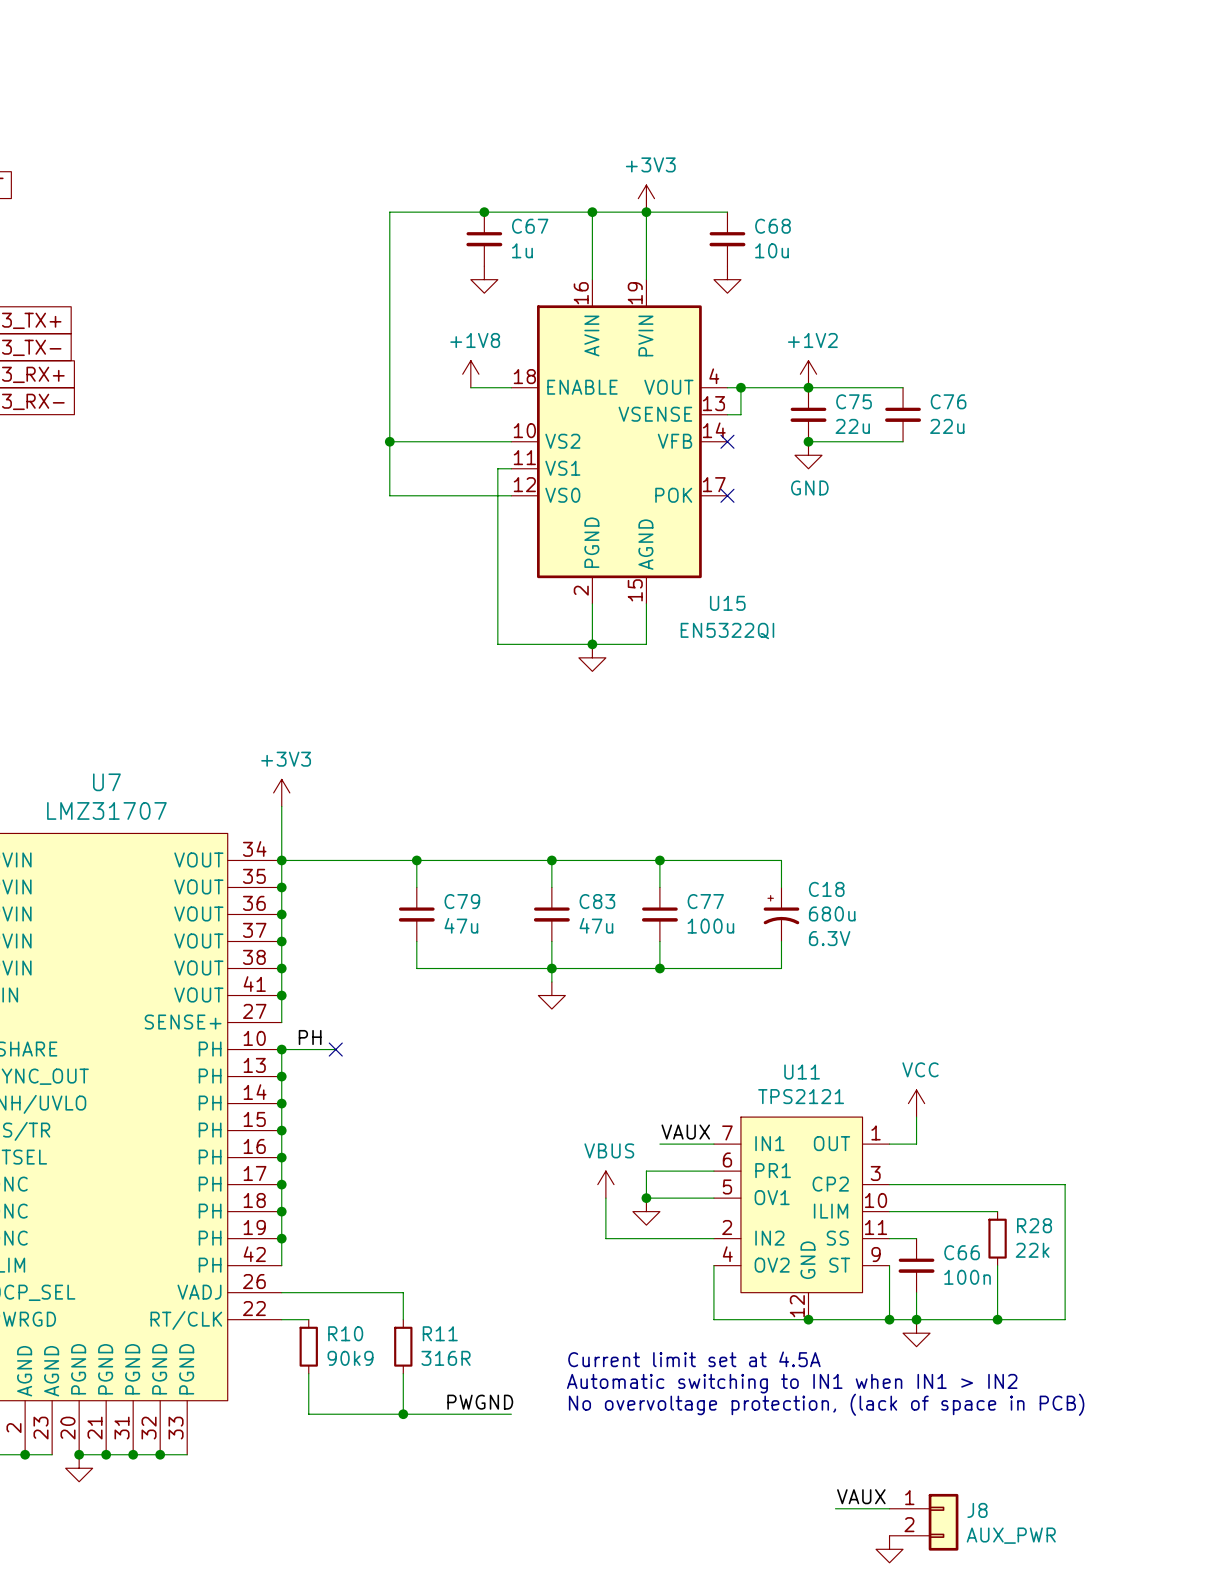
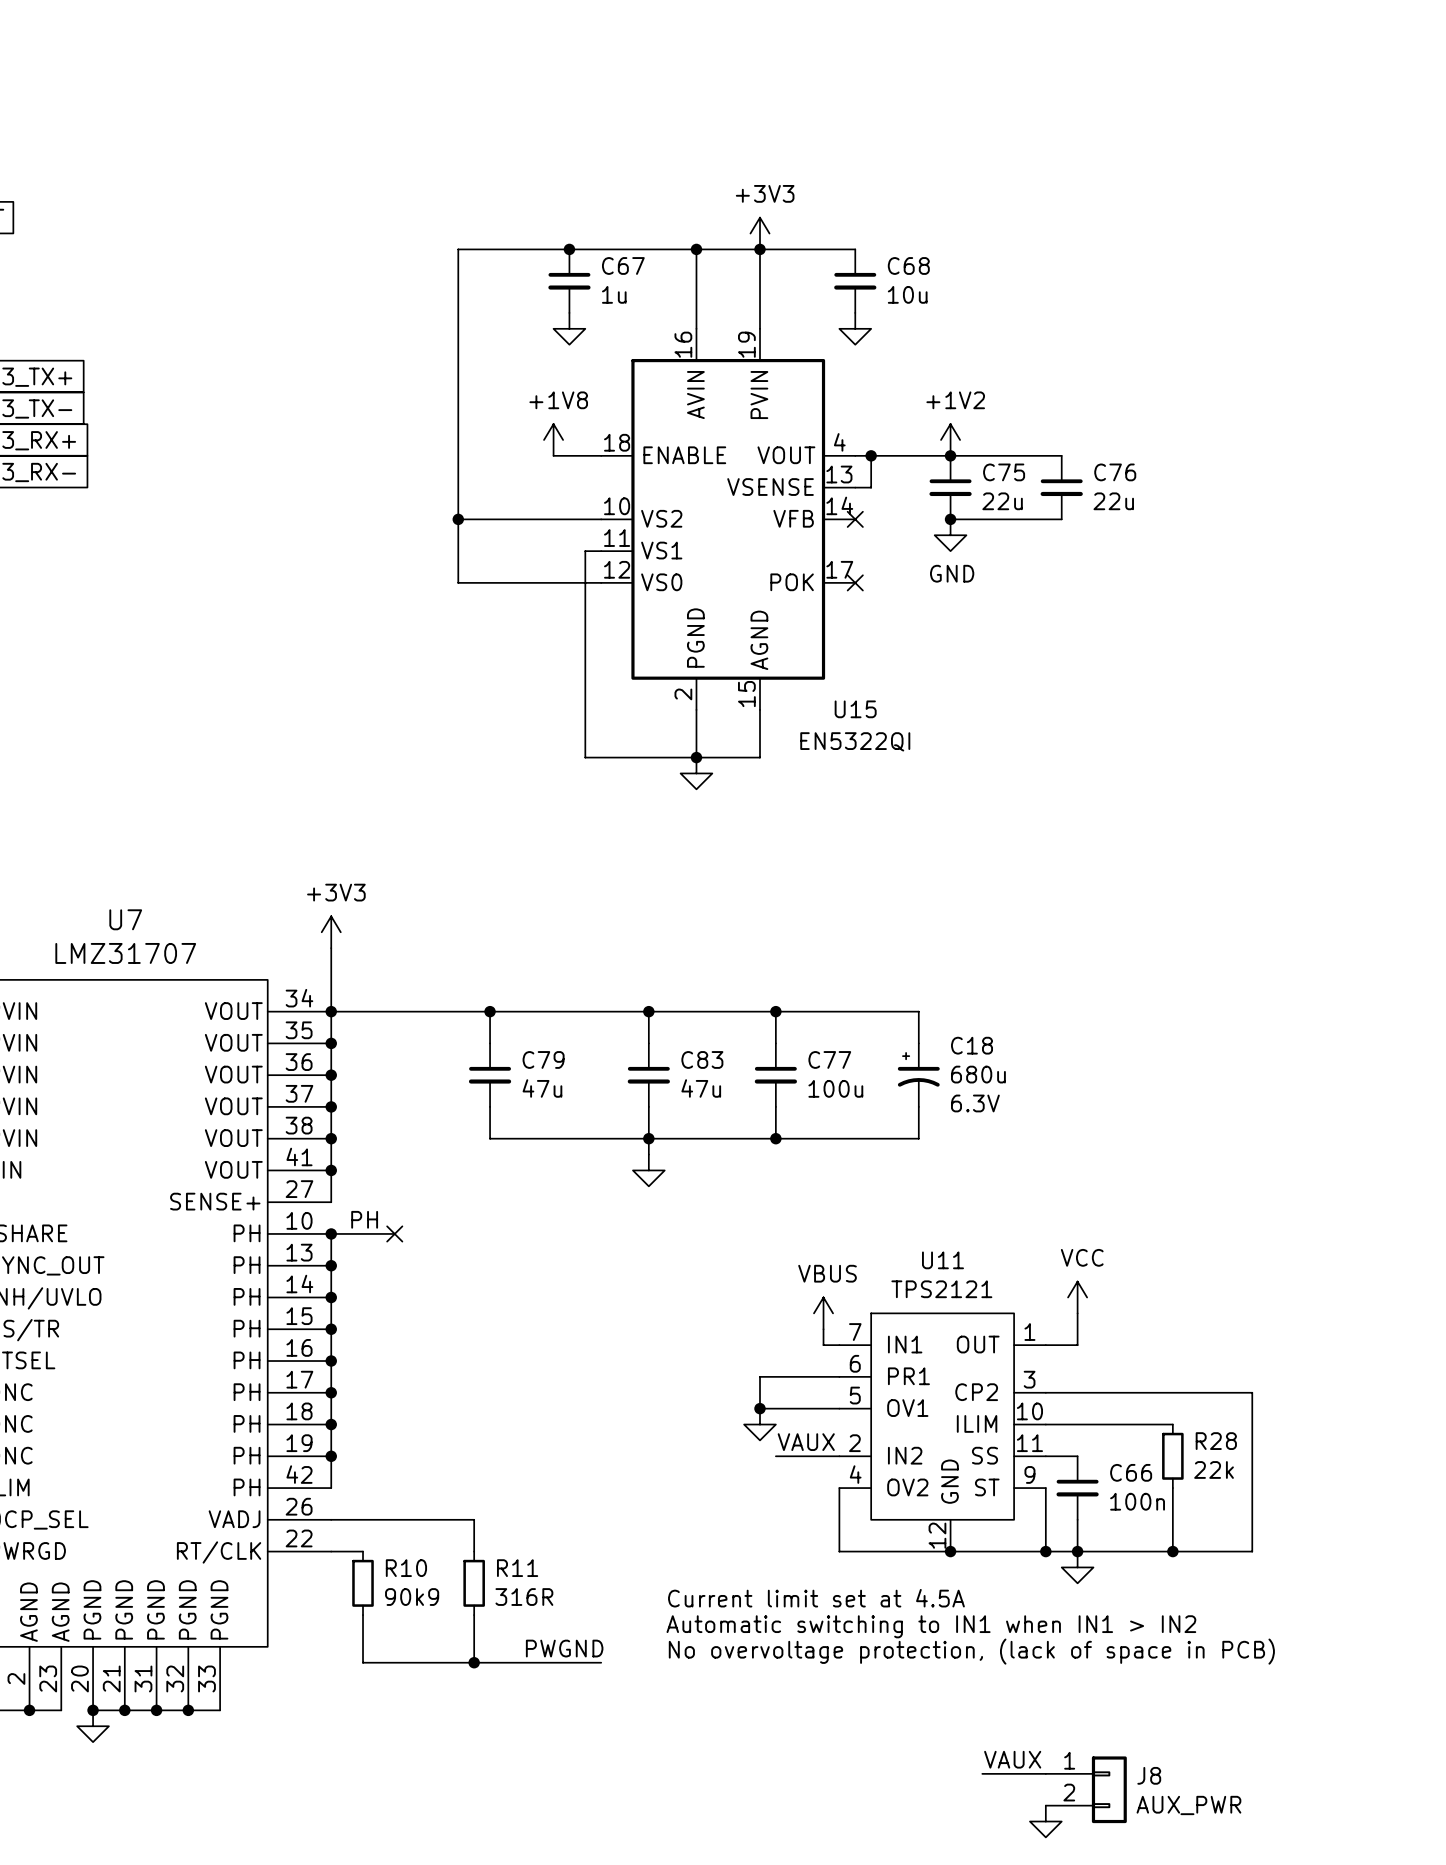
label position: VAUX (685, 1132) -> VAUX (806, 1442)
wire: (659, 1144) (700, 1144) -> (823, 1329) (823, 1345)
power symbol position: VBUS (605, 1184) -> VBUS (823, 1313)
wire: (605, 1198) (605, 1238) (659, 1238) -> none

